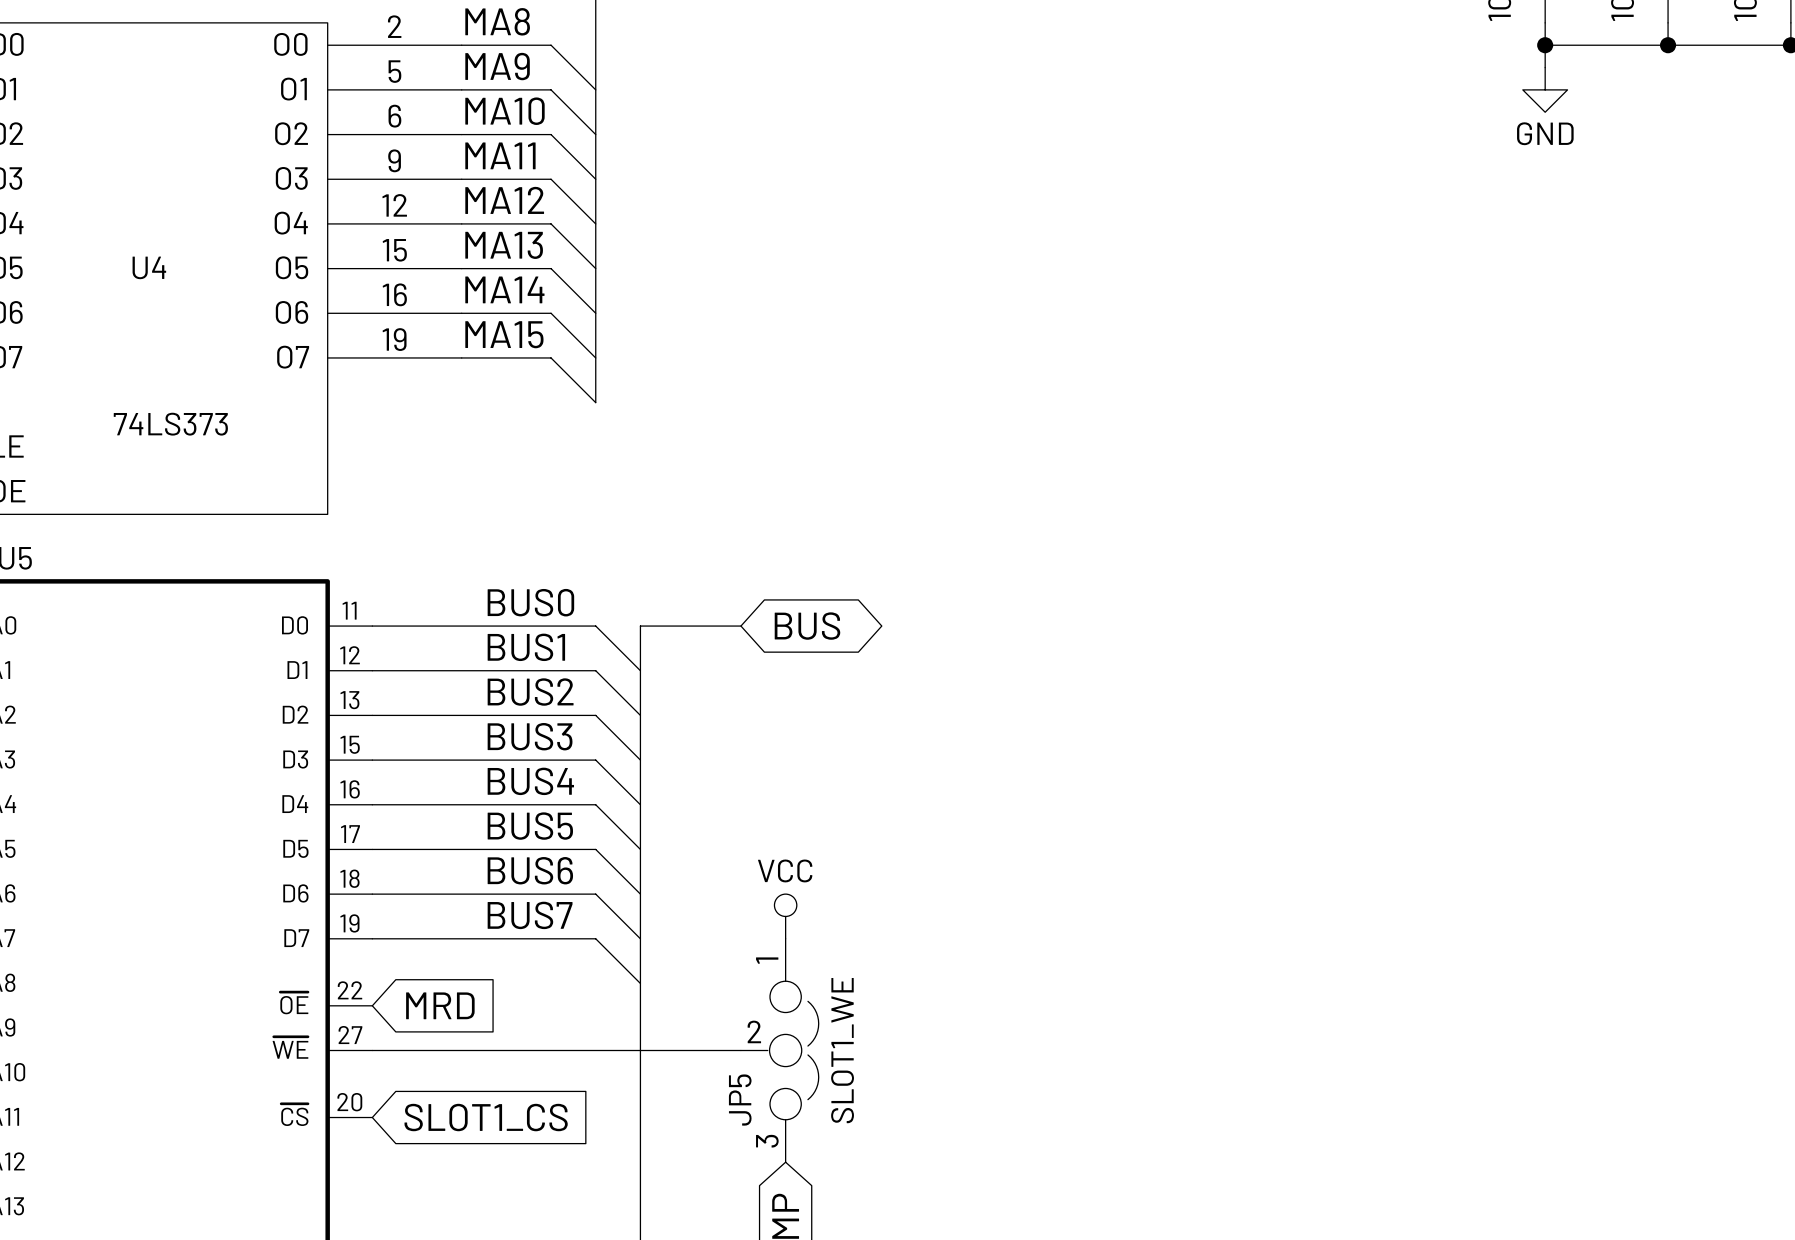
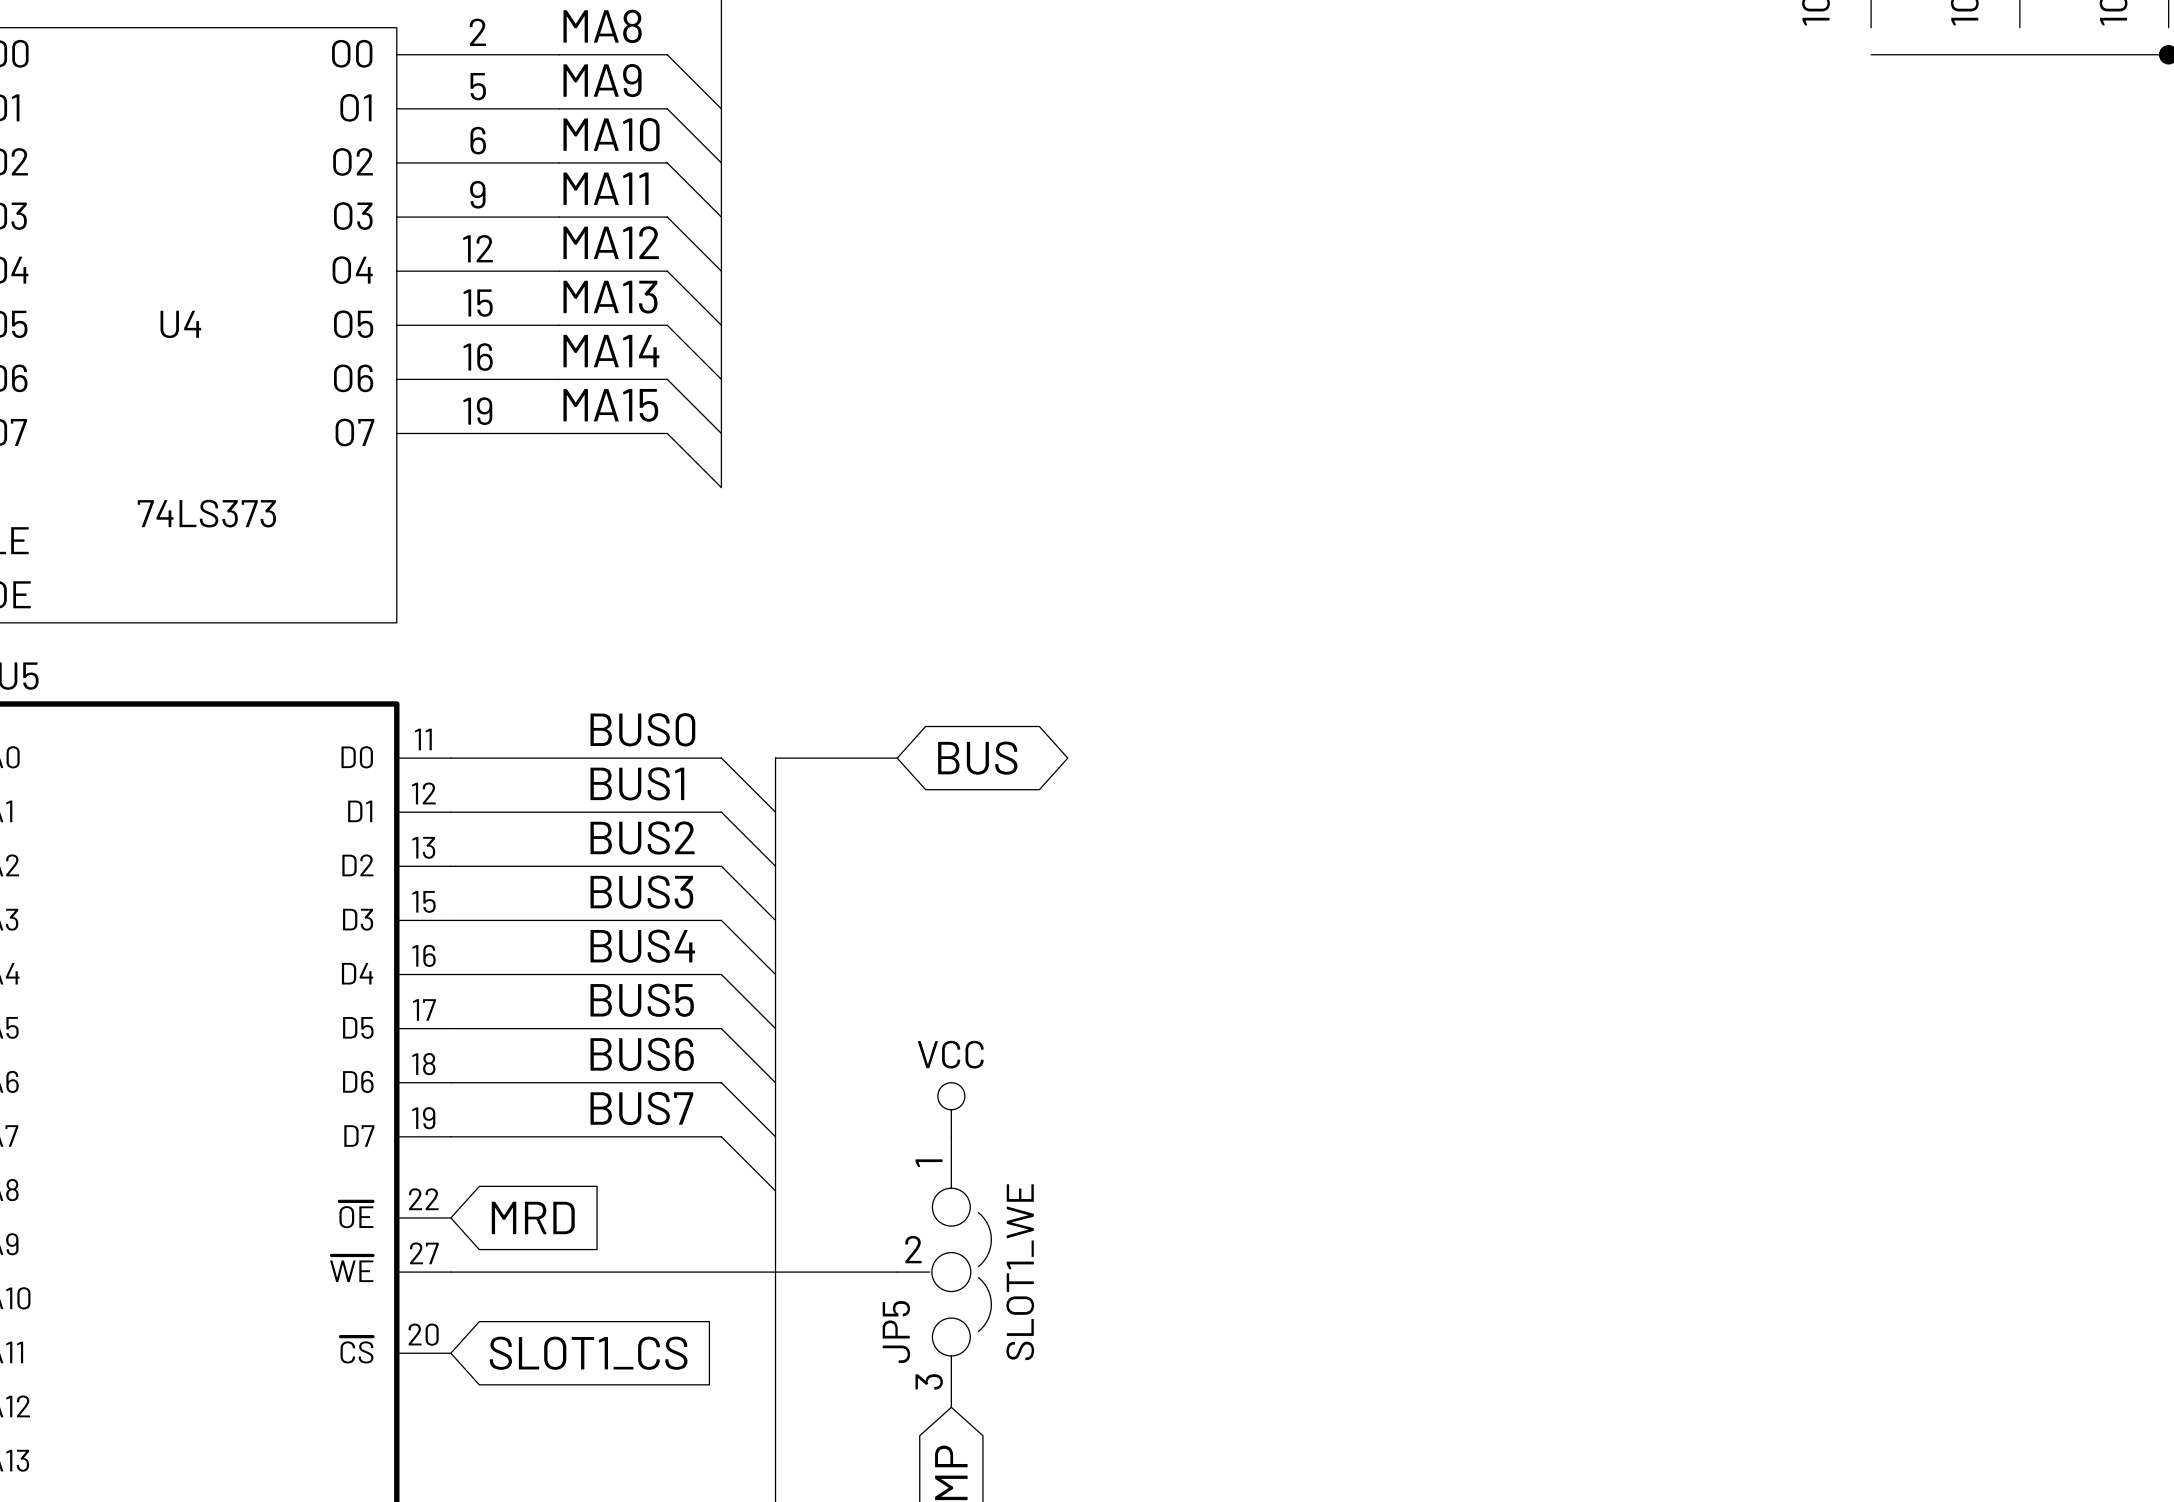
wire: (1545, 22) (1545, 67) -> none
wire: (1668, 22) (1668, 45) -> none
wire: (1790, 22) (1790, 45) -> none
junction: (1545, 45) -> none
junction: (1668, 45) -> none
power symbol: GND (1545, 89) -> none

